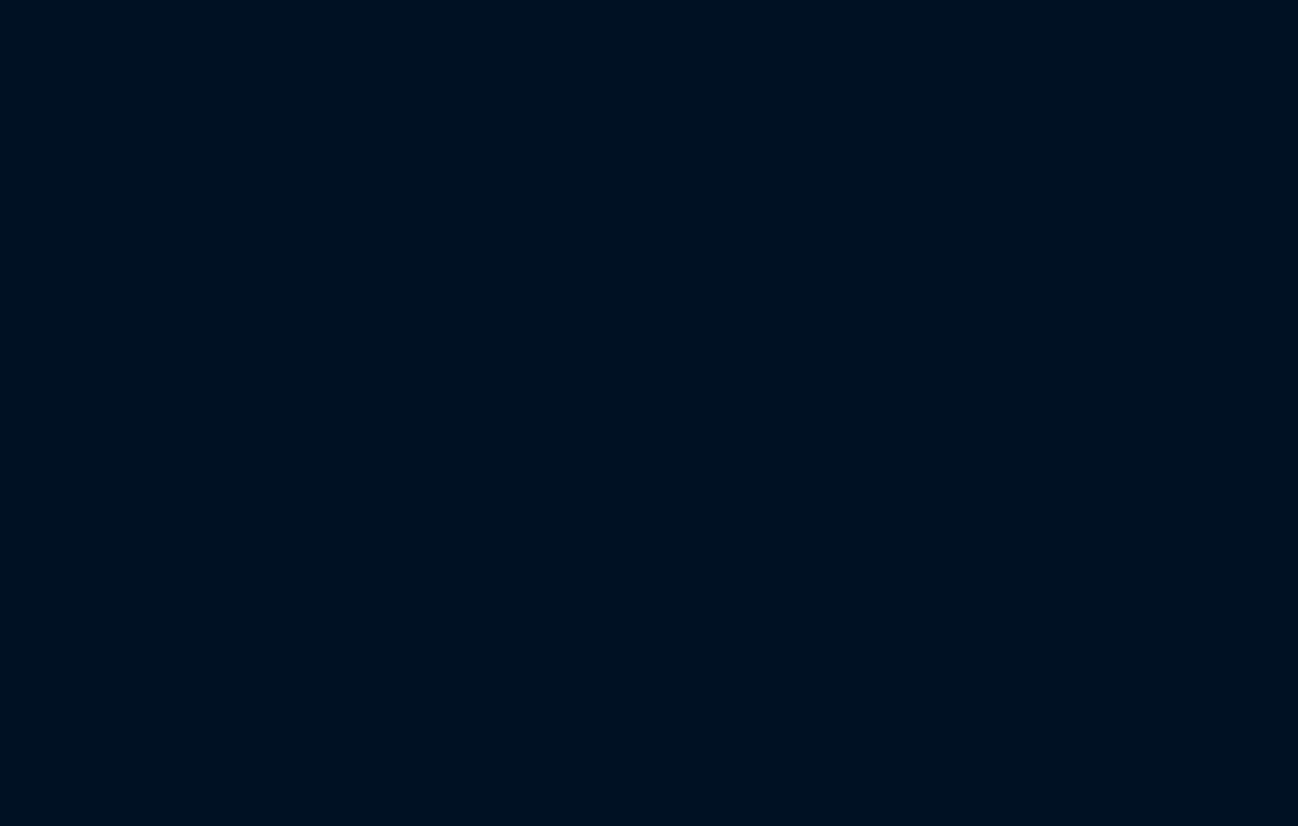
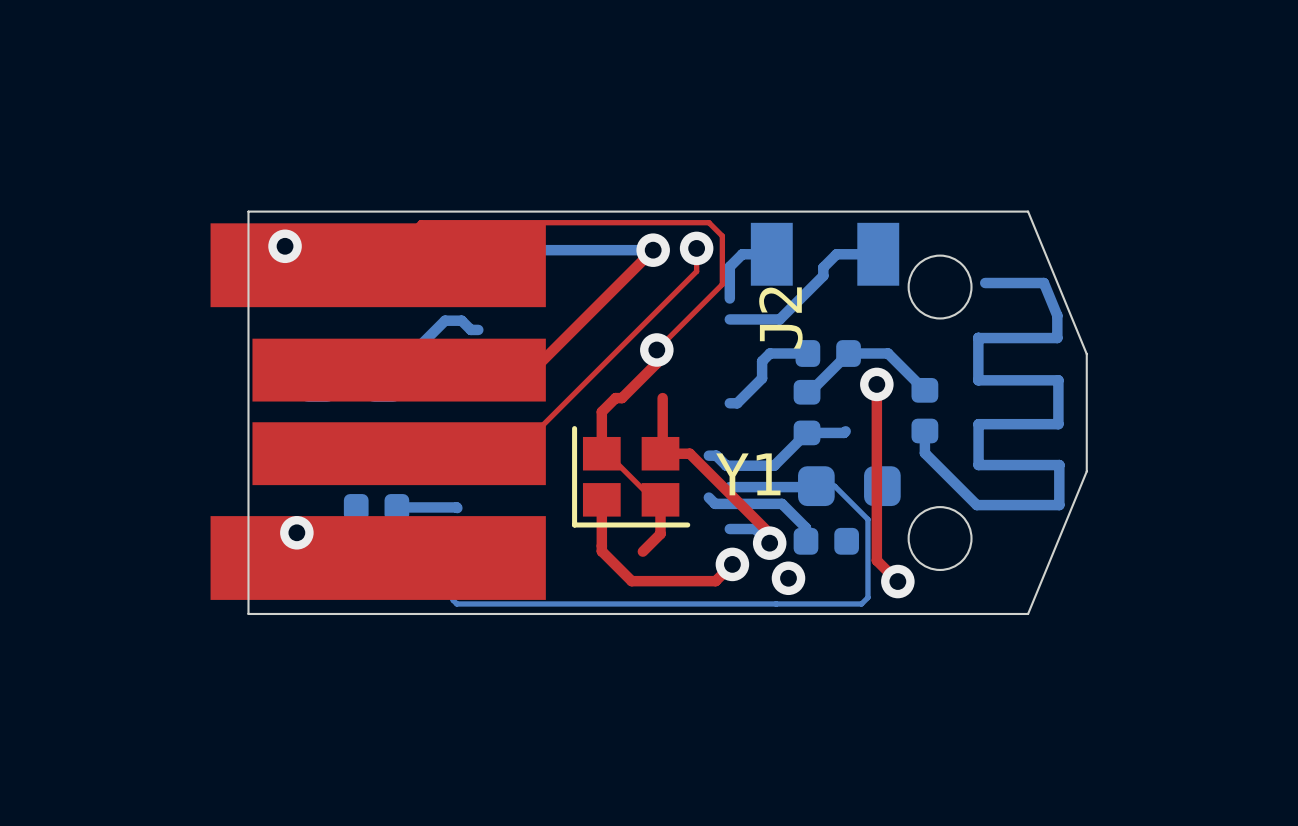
board edge: none -> (248, 211) (248, 613) (1028, 613) (1086, 471) (1086, 354) (1028, 211) (248, 211)
top track: none -> (285, 246) (304, 265) (378, 265) (420, 222) (708, 222) (722, 236) (722, 284) (656, 349) (656, 363) (622, 398) (615, 398) (601, 411) (601, 453) (607, 453) (653, 499) (660, 499) (660, 533) (642, 551)
via: none -> (285, 246)
top track: none -> (696, 248) (696, 271) (514, 453) (399, 453)
via: none -> (696, 248)
top track: none -> (653, 250) (533, 370) (399, 370)
bottom track: none -> (653, 250) (540, 250) (520, 270) (520, 277)
via: none -> (653, 250)
bottom track: none -> (771, 254) (742, 254) (729, 266) (729, 298)
part: none -> (825, 254)
bottom track: none -> (878, 254) (836, 254) (823, 267) (823, 275) (779, 319) (729, 319)
round board edge: none -> [907, 254, 973, 320]
bottom track: none -> (985, 283) (1043, 283)
bottom track: none -> (1043, 283) (1057, 315) (1057, 338) (978, 338)
bottom track: none -> (478, 329) (470, 329) (461, 320) (445, 320) (383, 382)
bottom track: none -> (978, 337) (978, 380) (1058, 380) (1058, 424) (978, 424) (978, 465) (1059, 465) (1059, 505) (976, 505) (924, 453) (924, 430)
via: none -> (656, 349)
bottom track: none -> (807, 353) (769, 353) (762, 361) (762, 378) (737, 403) (729, 403)
part: none -> (828, 353)
top track: none -> (876, 384) (876, 560) (897, 581)
via: none -> (876, 384)
bottom track: none -> (924, 390) (888, 353) (848, 353) (809, 392) (807, 392)
top track: none -> (662, 398) (662, 451) (660, 453) (689, 453) (769, 533) (769, 543)
part: none -> (924, 410)
J2: none -> (378, 411)
part: none -> (807, 412)
bottom track: none -> (845, 431) (844, 432) (807, 432) (774, 465) (726, 465) (716, 455) (708, 455)
Y1: none -> (631, 476)
part: none -> (849, 486)
bottom track: none -> (729, 487) (834, 486) (867, 519) (867, 597) (861, 603) (456, 603) (453, 600) (453, 586) (510, 527)
bottom track: none -> (708, 497) (715, 503) (781, 503) (805, 527) (805, 541)
top track: none -> (601, 499) (601, 551) (631, 581) (715, 581) (732, 564)
round board edge: none -> [907, 506, 973, 572]
part: none -> (376, 507)
bottom track: none -> (396, 507) (457, 508)
bottom track: none -> (729, 529) (755, 529) (769, 543)
via: none -> (296, 532)
part: none -> (826, 541)
via: none -> (769, 543)
via: none -> (732, 564)
via: none -> (788, 578)
via: none -> (897, 581)

